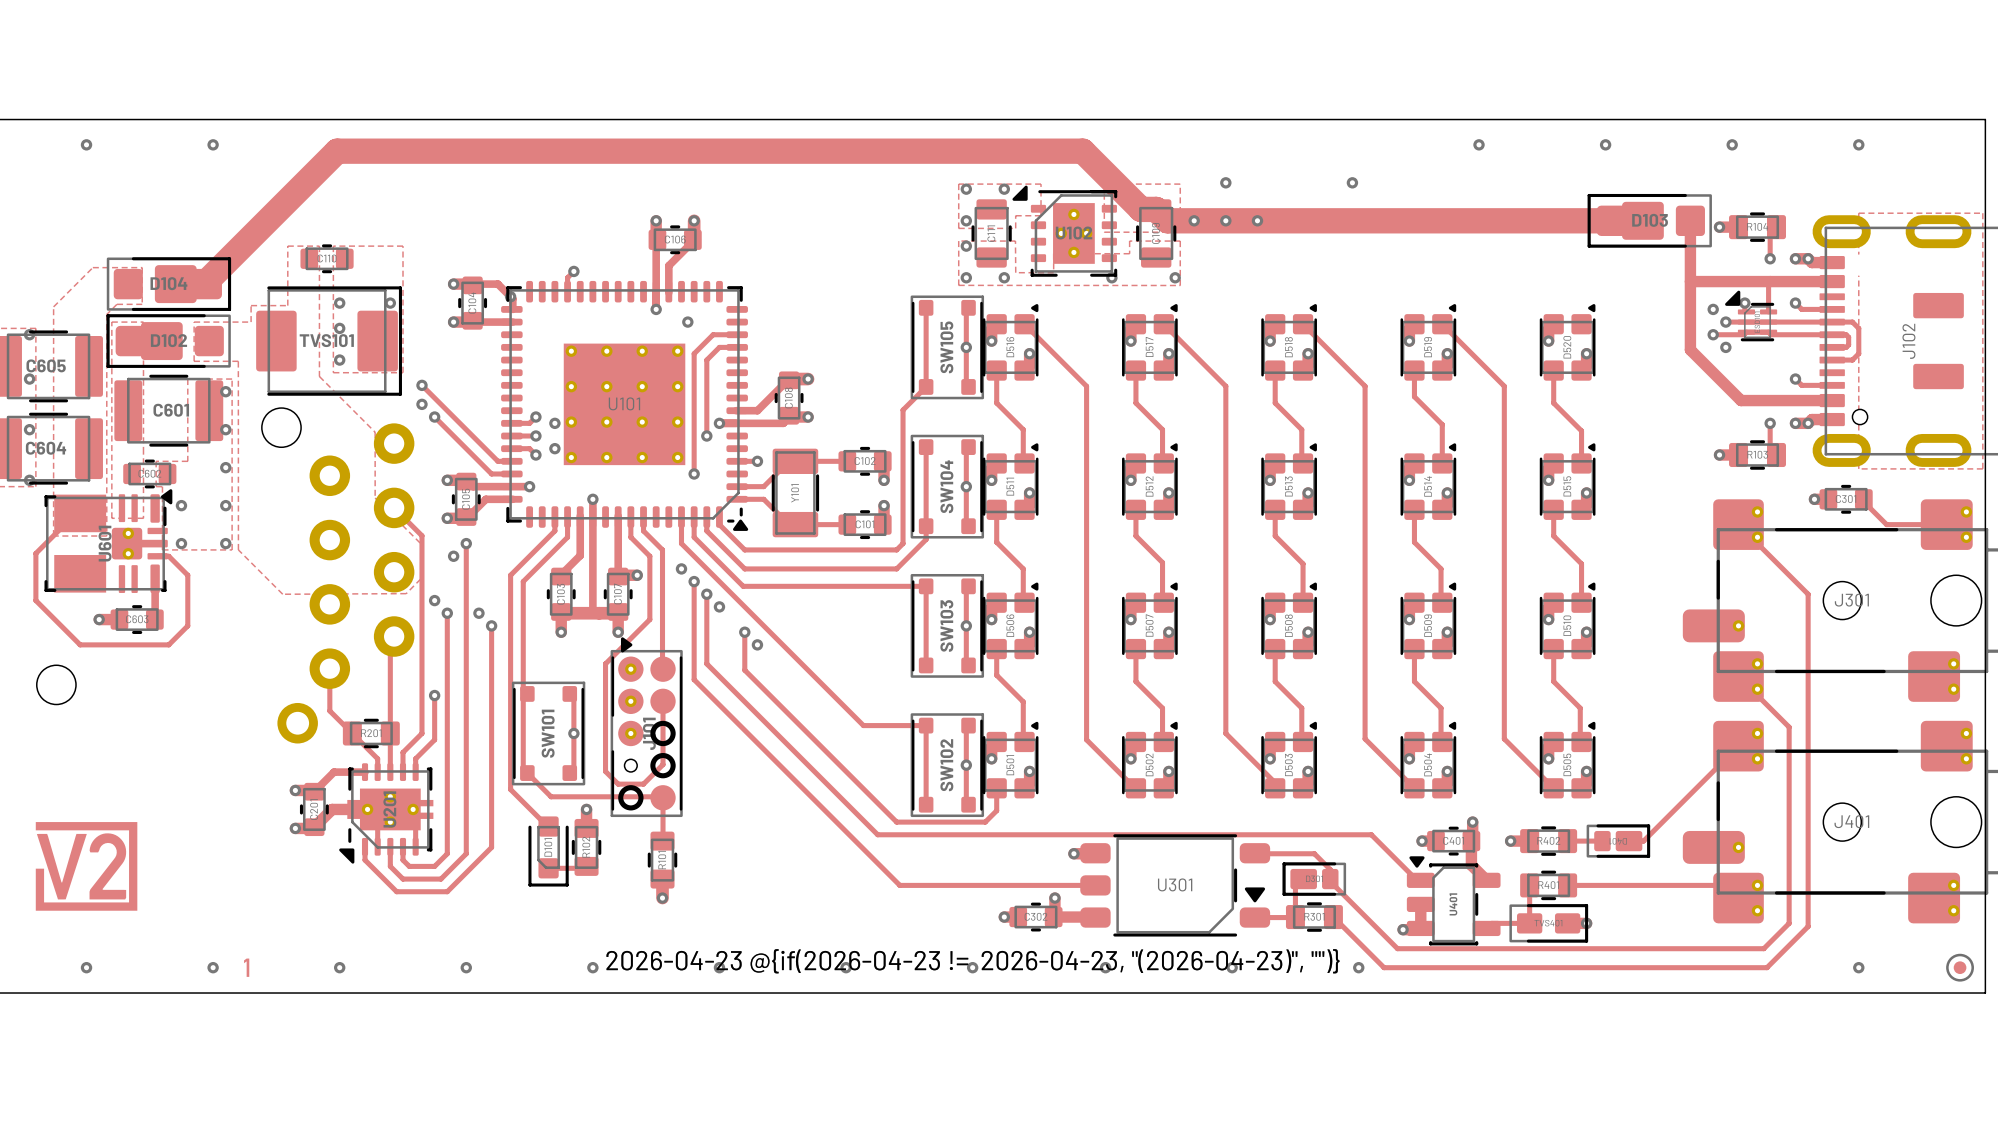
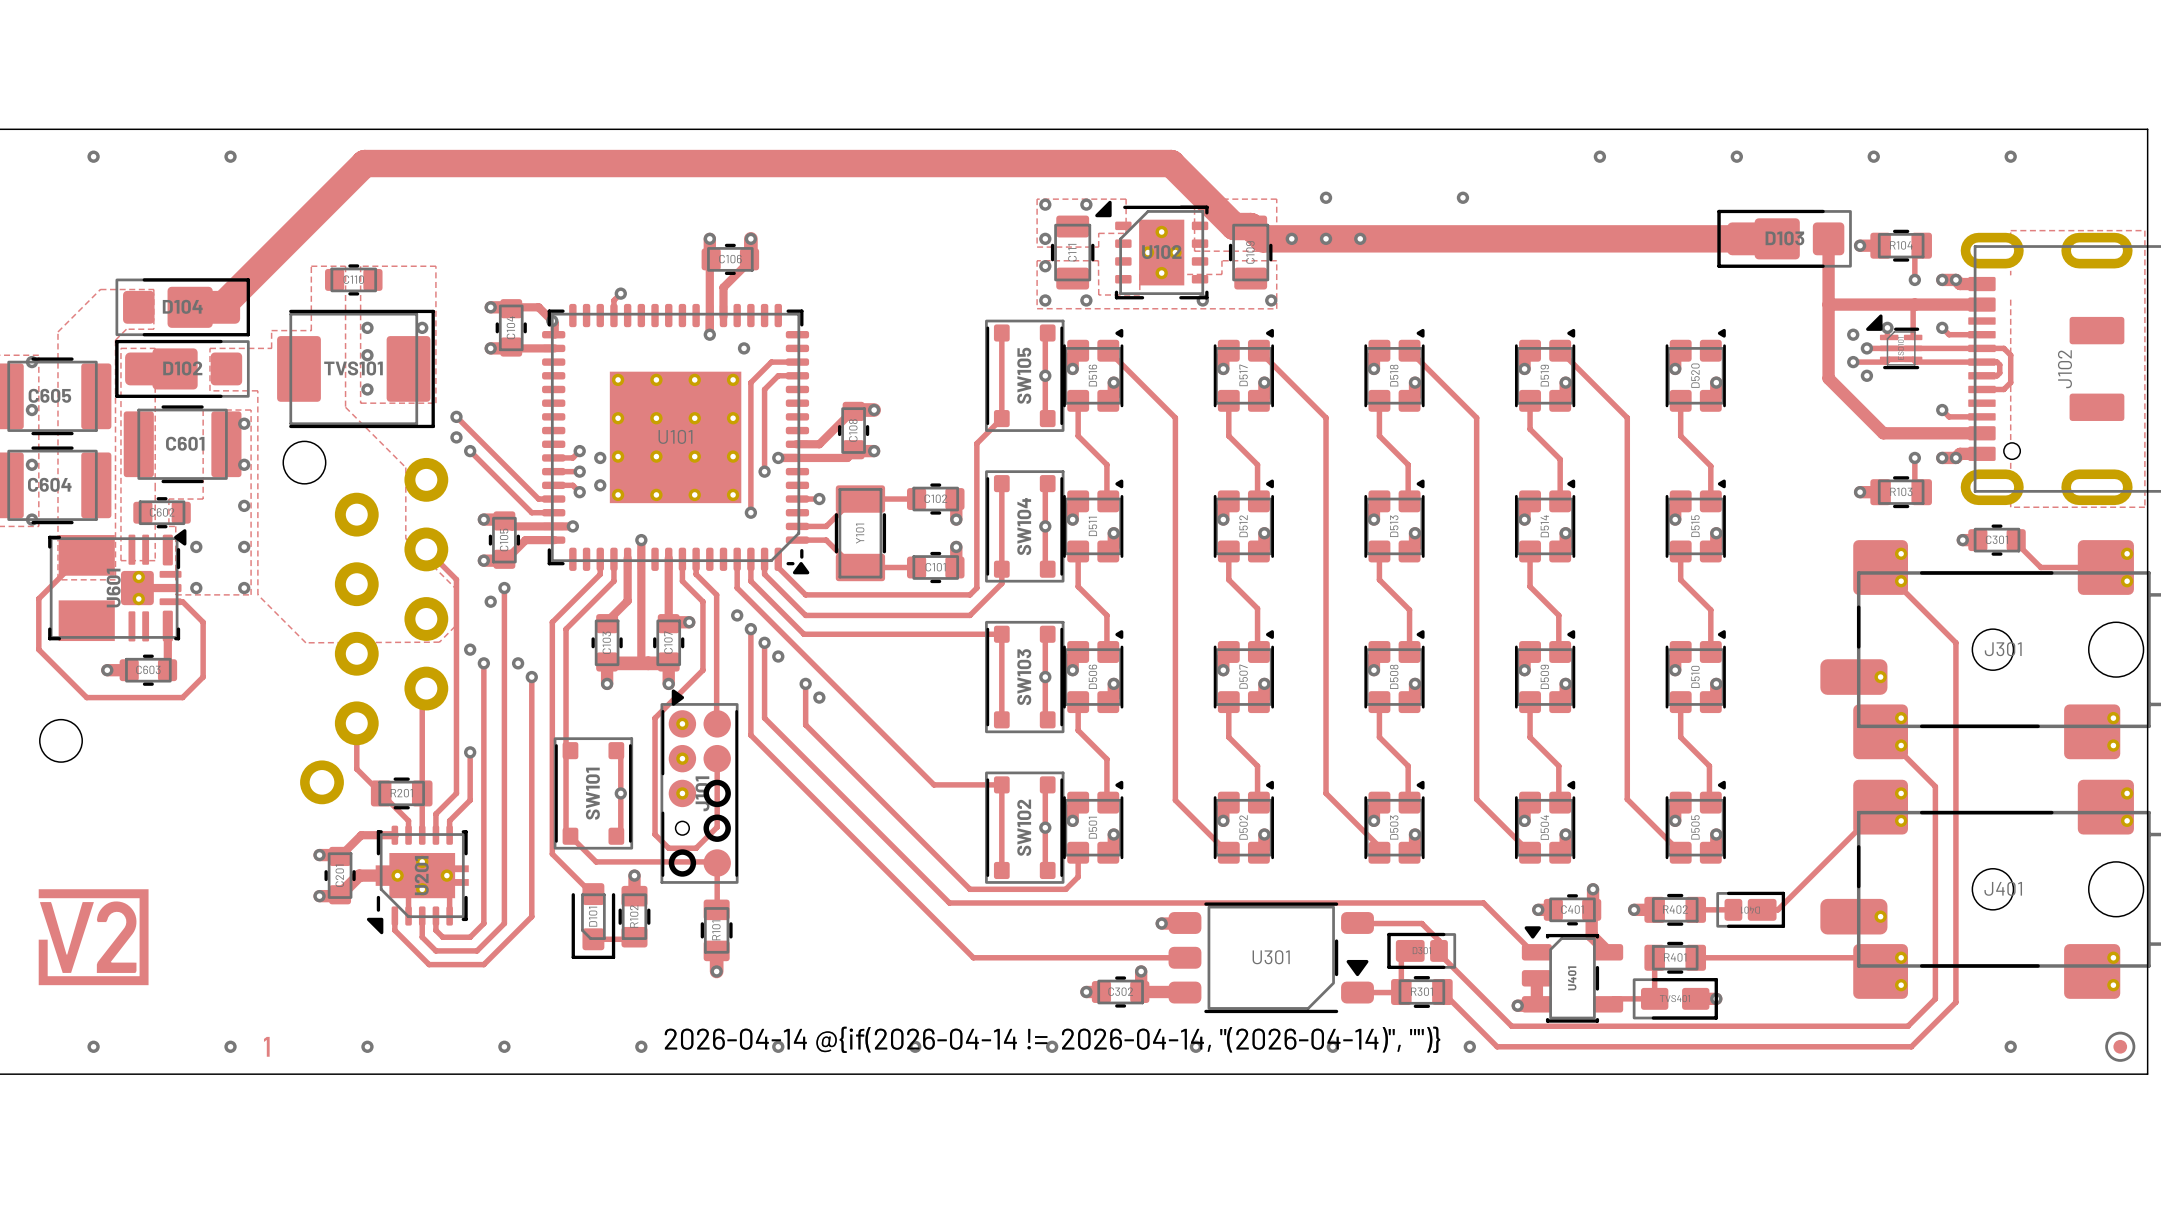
drawing shape: [606, 949, 1340, 974] -> [664, 1026, 1441, 1053]

